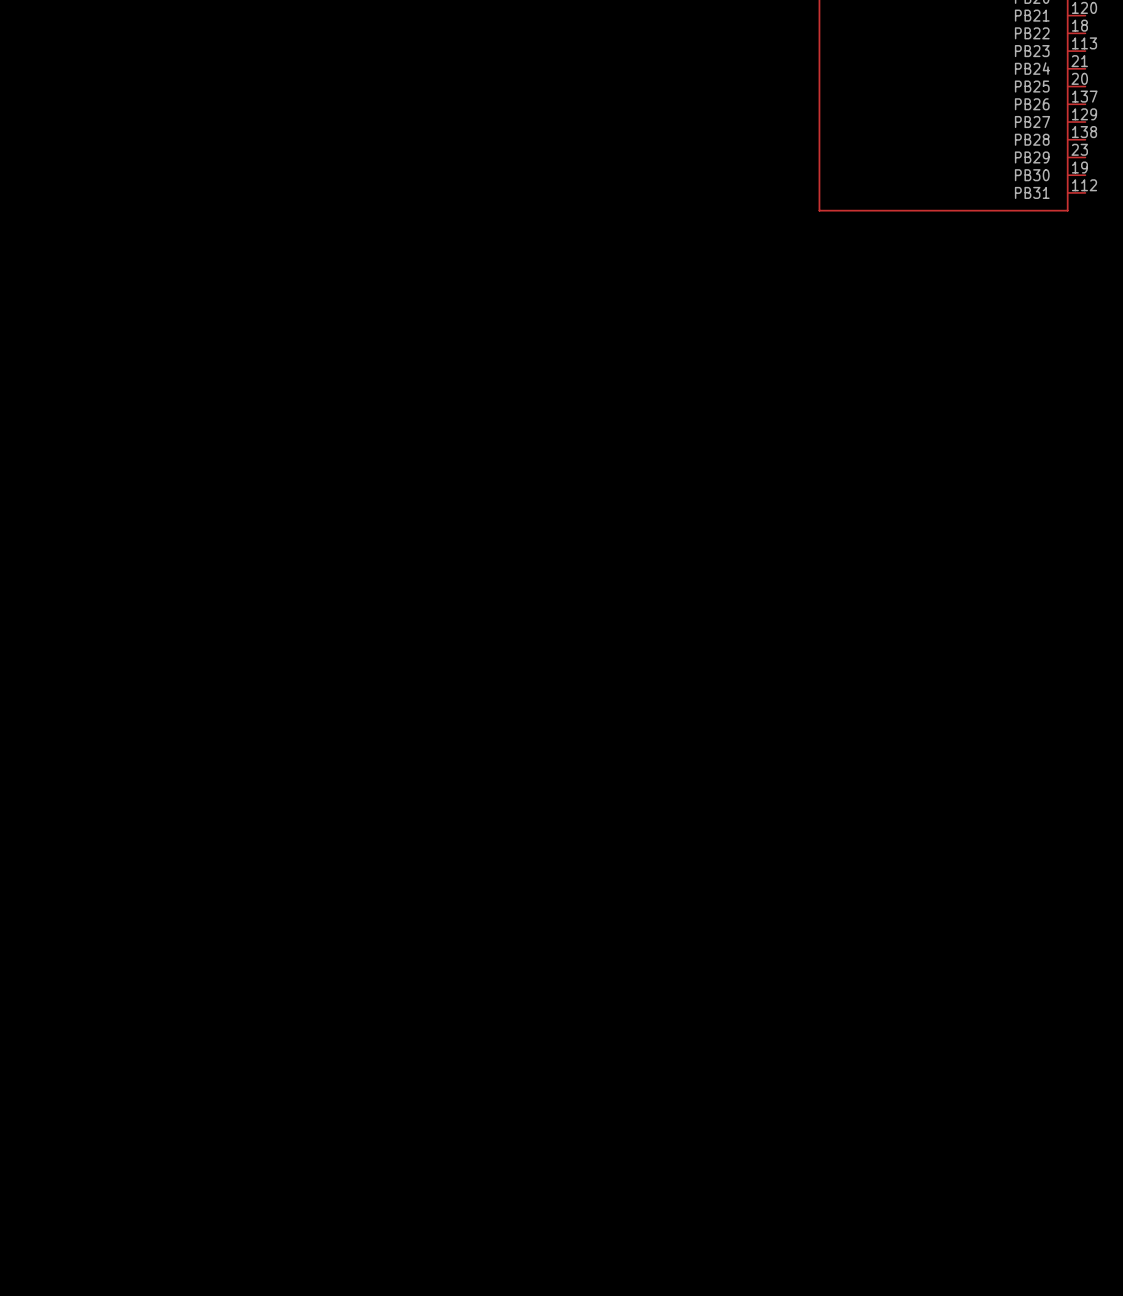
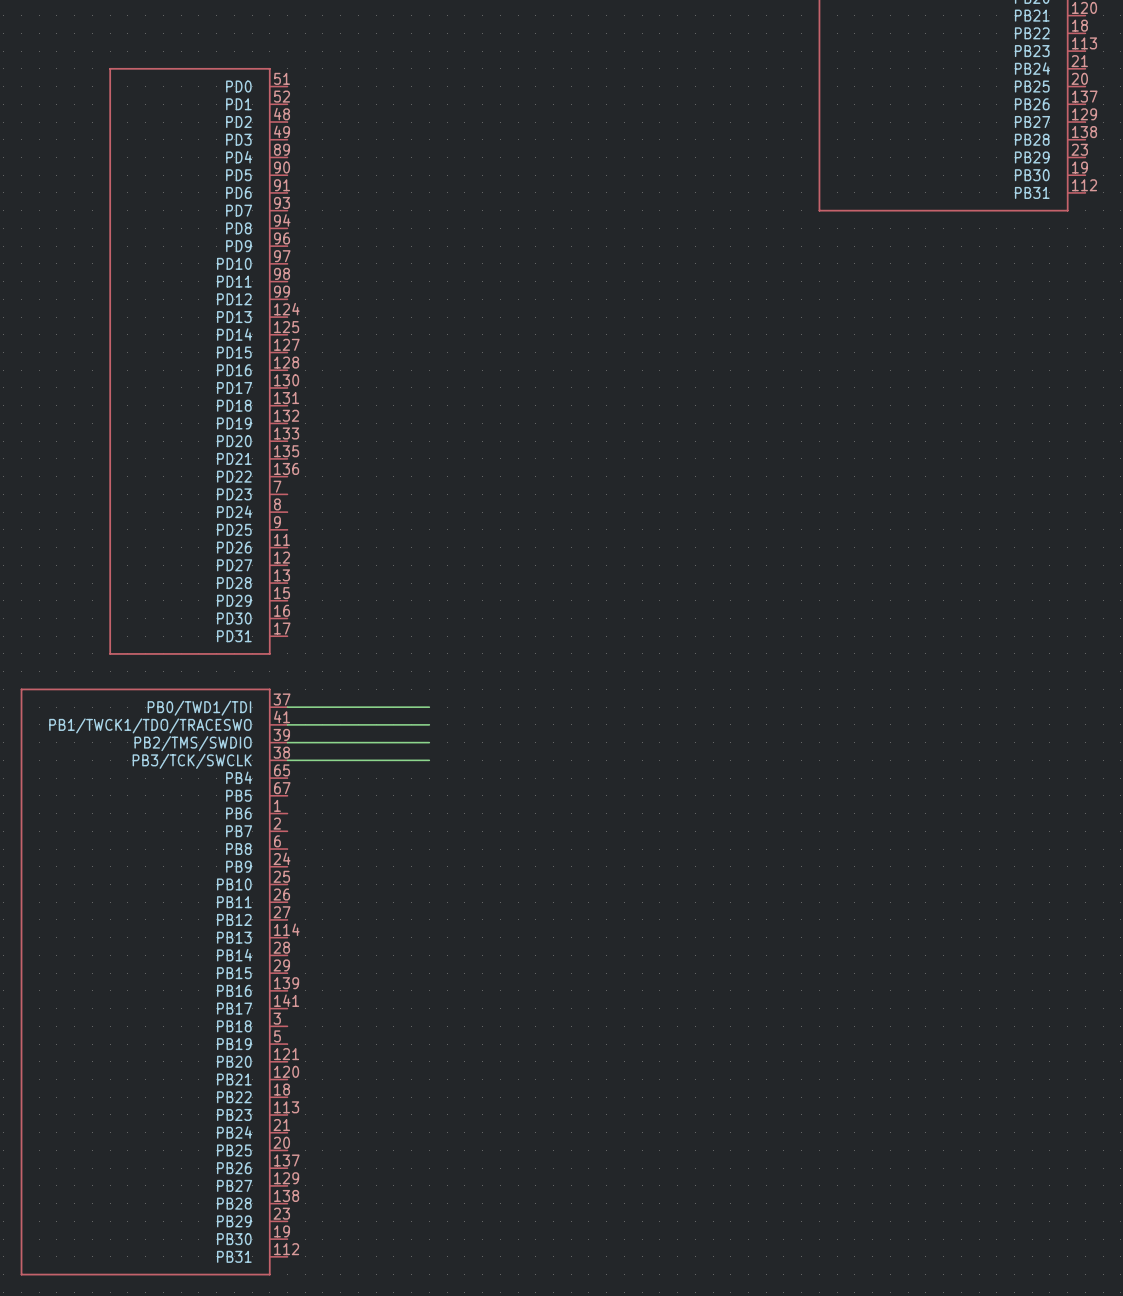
part: none -> (198, 361)
wire: none -> (287, 707) (429, 707)
wire: none -> (287, 724) (429, 724)
wire: none -> (287, 742) (429, 742)
wire: none -> (287, 760) (429, 760)
part: none -> (154, 982)

